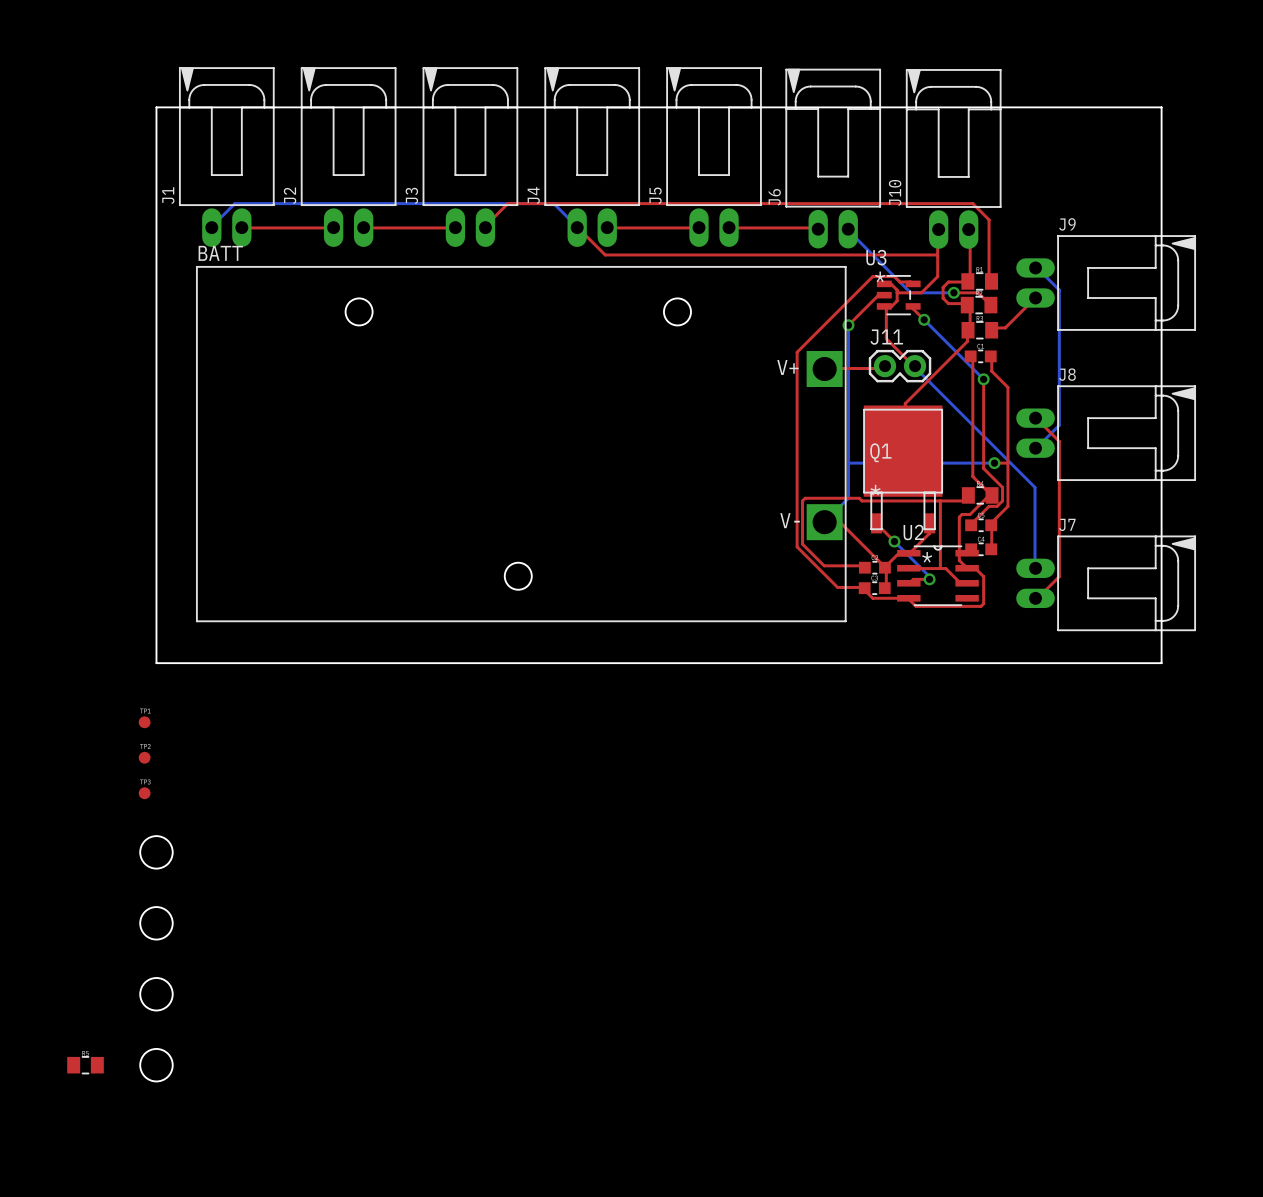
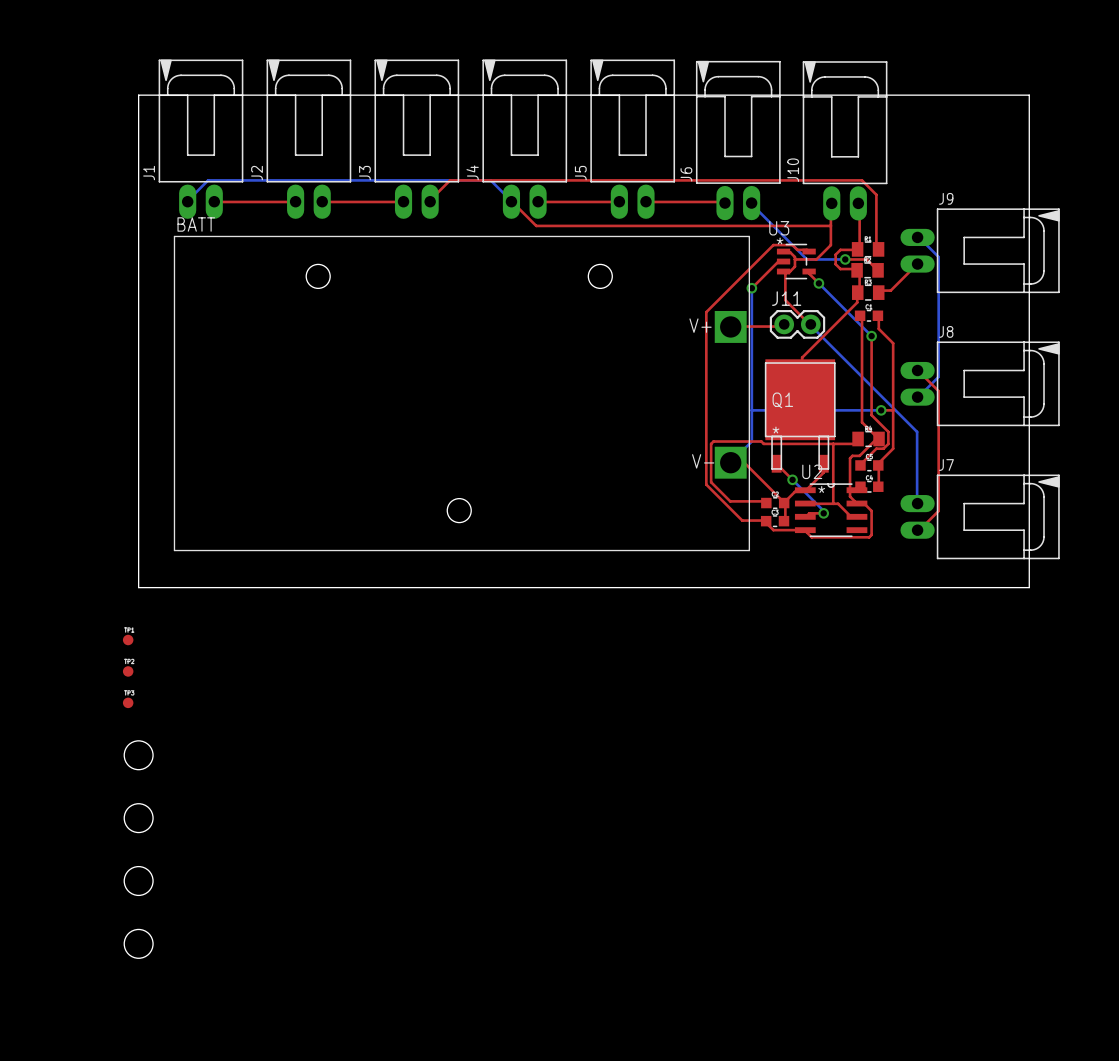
part: (85, 1065) -> none

